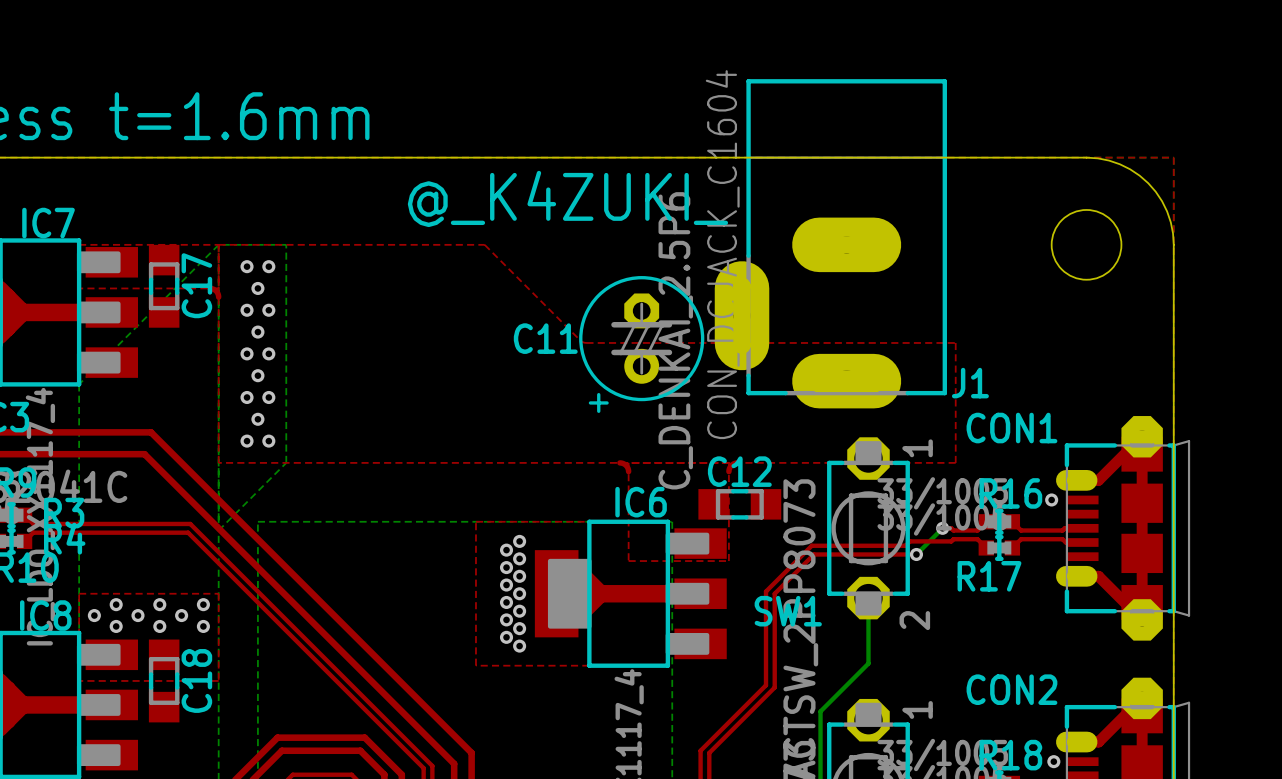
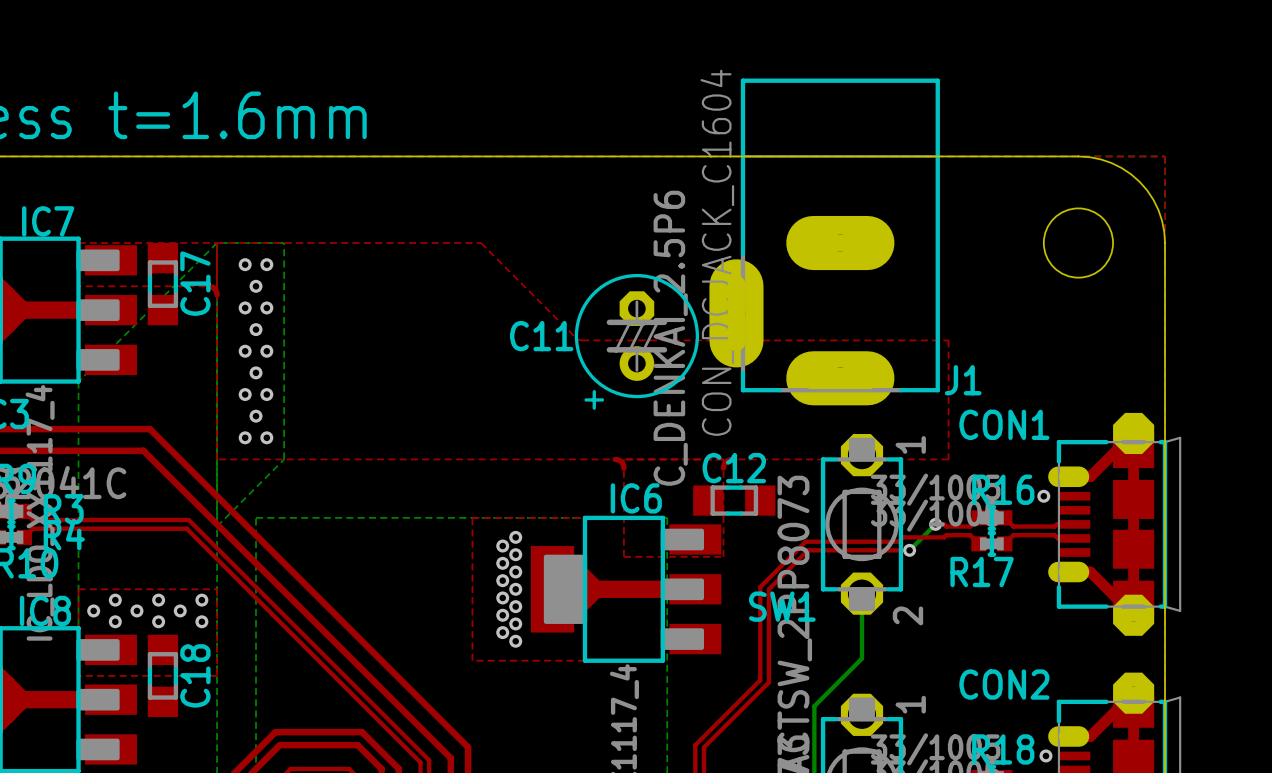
text: @_K4ZUKI_ (567, 198) -> none

